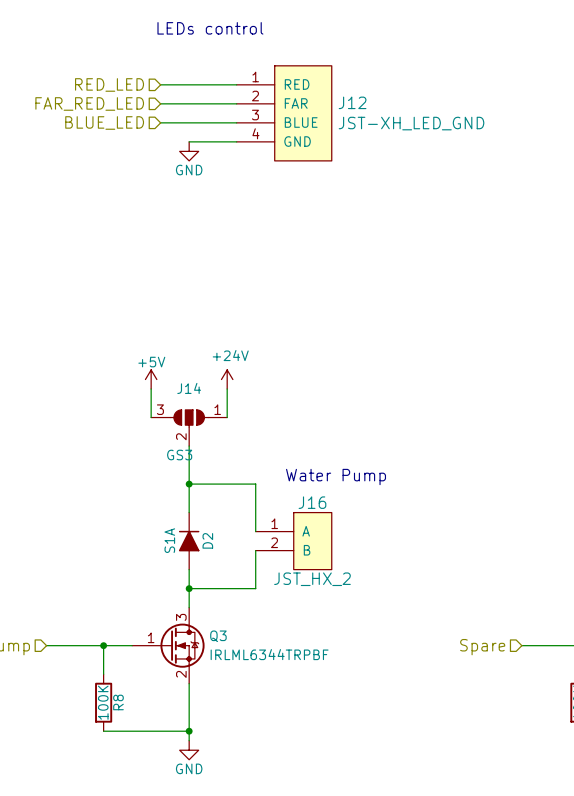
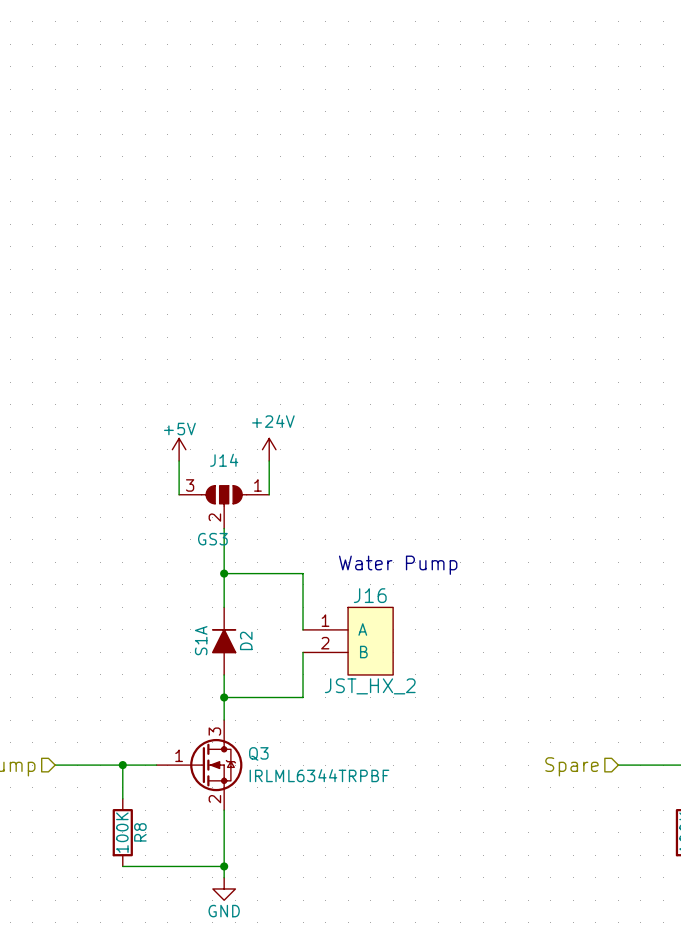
text: LEDs control (210, 28) -> none
hierarchical label: RED_LED (109, 84) -> none
wire: (160, 84) (236, 84) -> none
hierarchical label: FAR_RED_LED (89, 103) -> none
wire: (160, 103) (236, 103) -> none
J12: JST-XH_LED_GND (284, 113) -> none
hierarchical label: BLUE_LED (104, 122) -> none
wire: (160, 122) (236, 122) -> none
wire: (189, 141) (236, 141) -> none
power symbol: GND (189, 151) -> none

